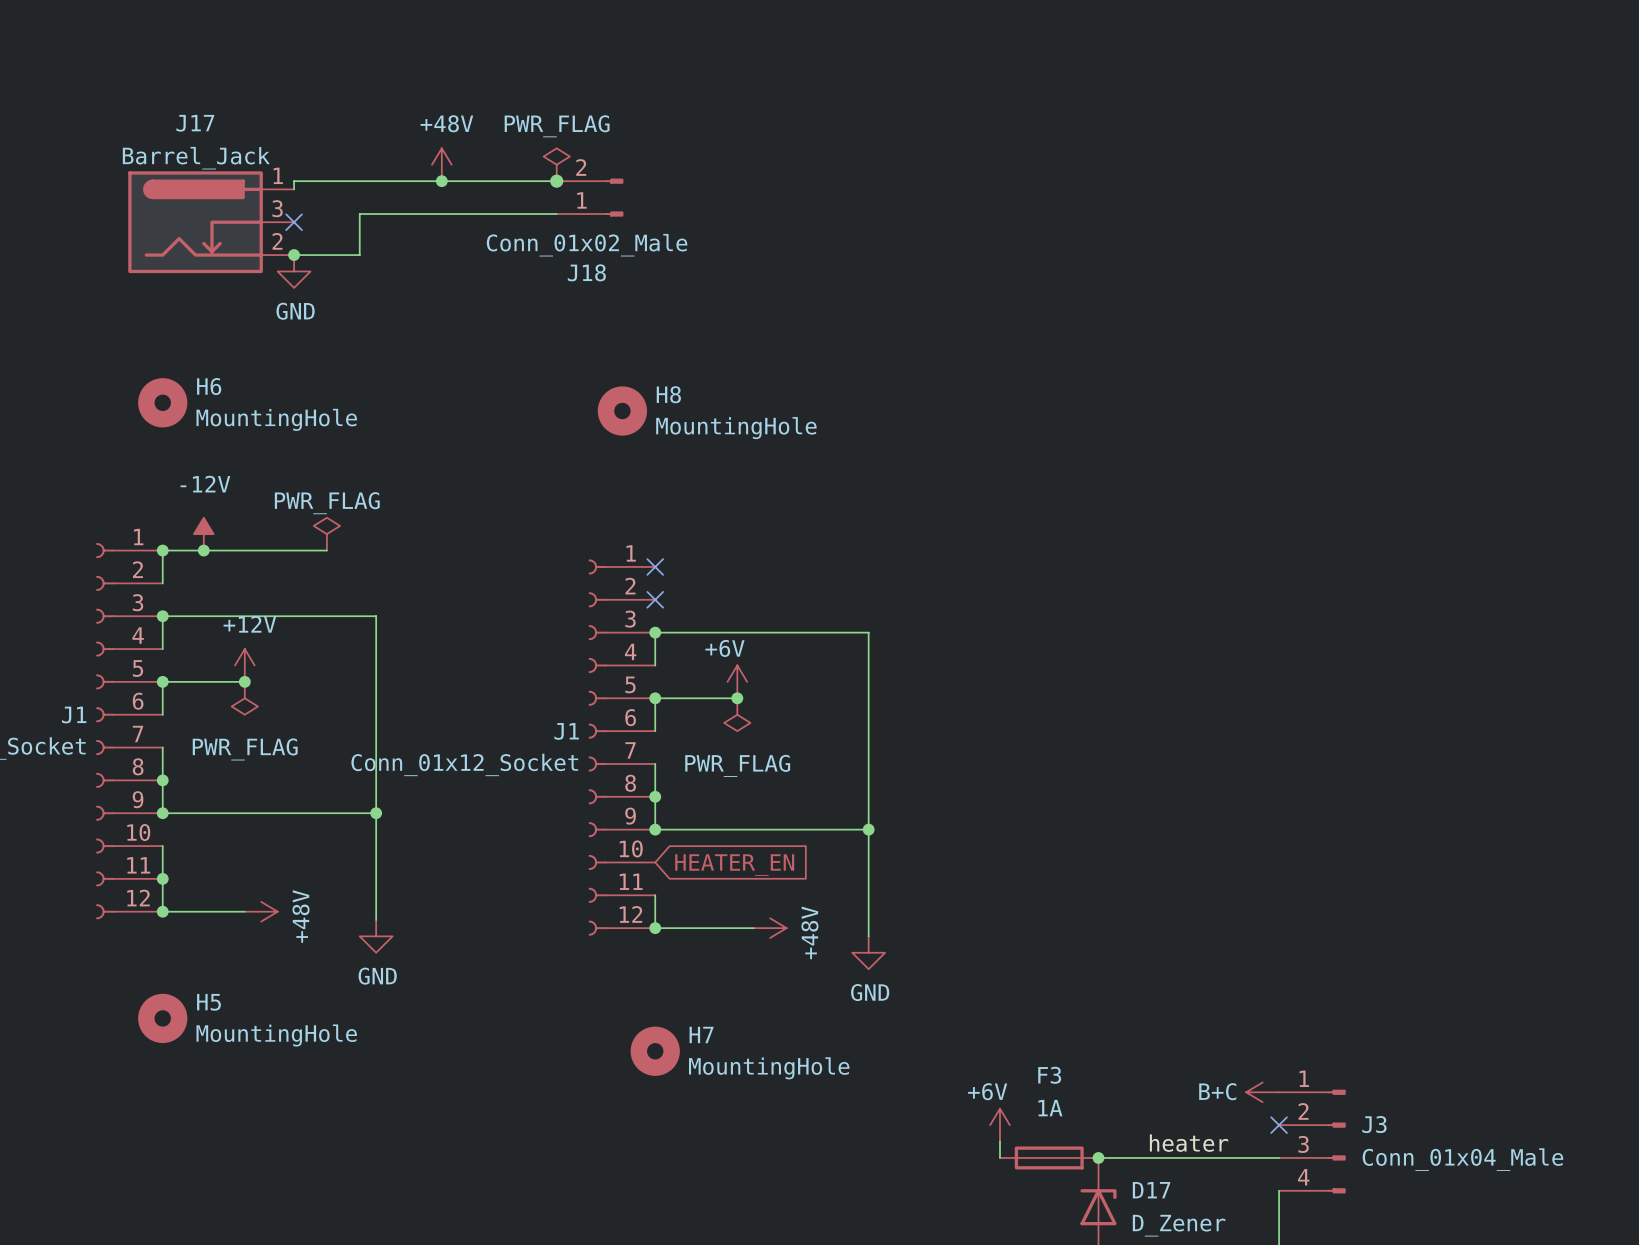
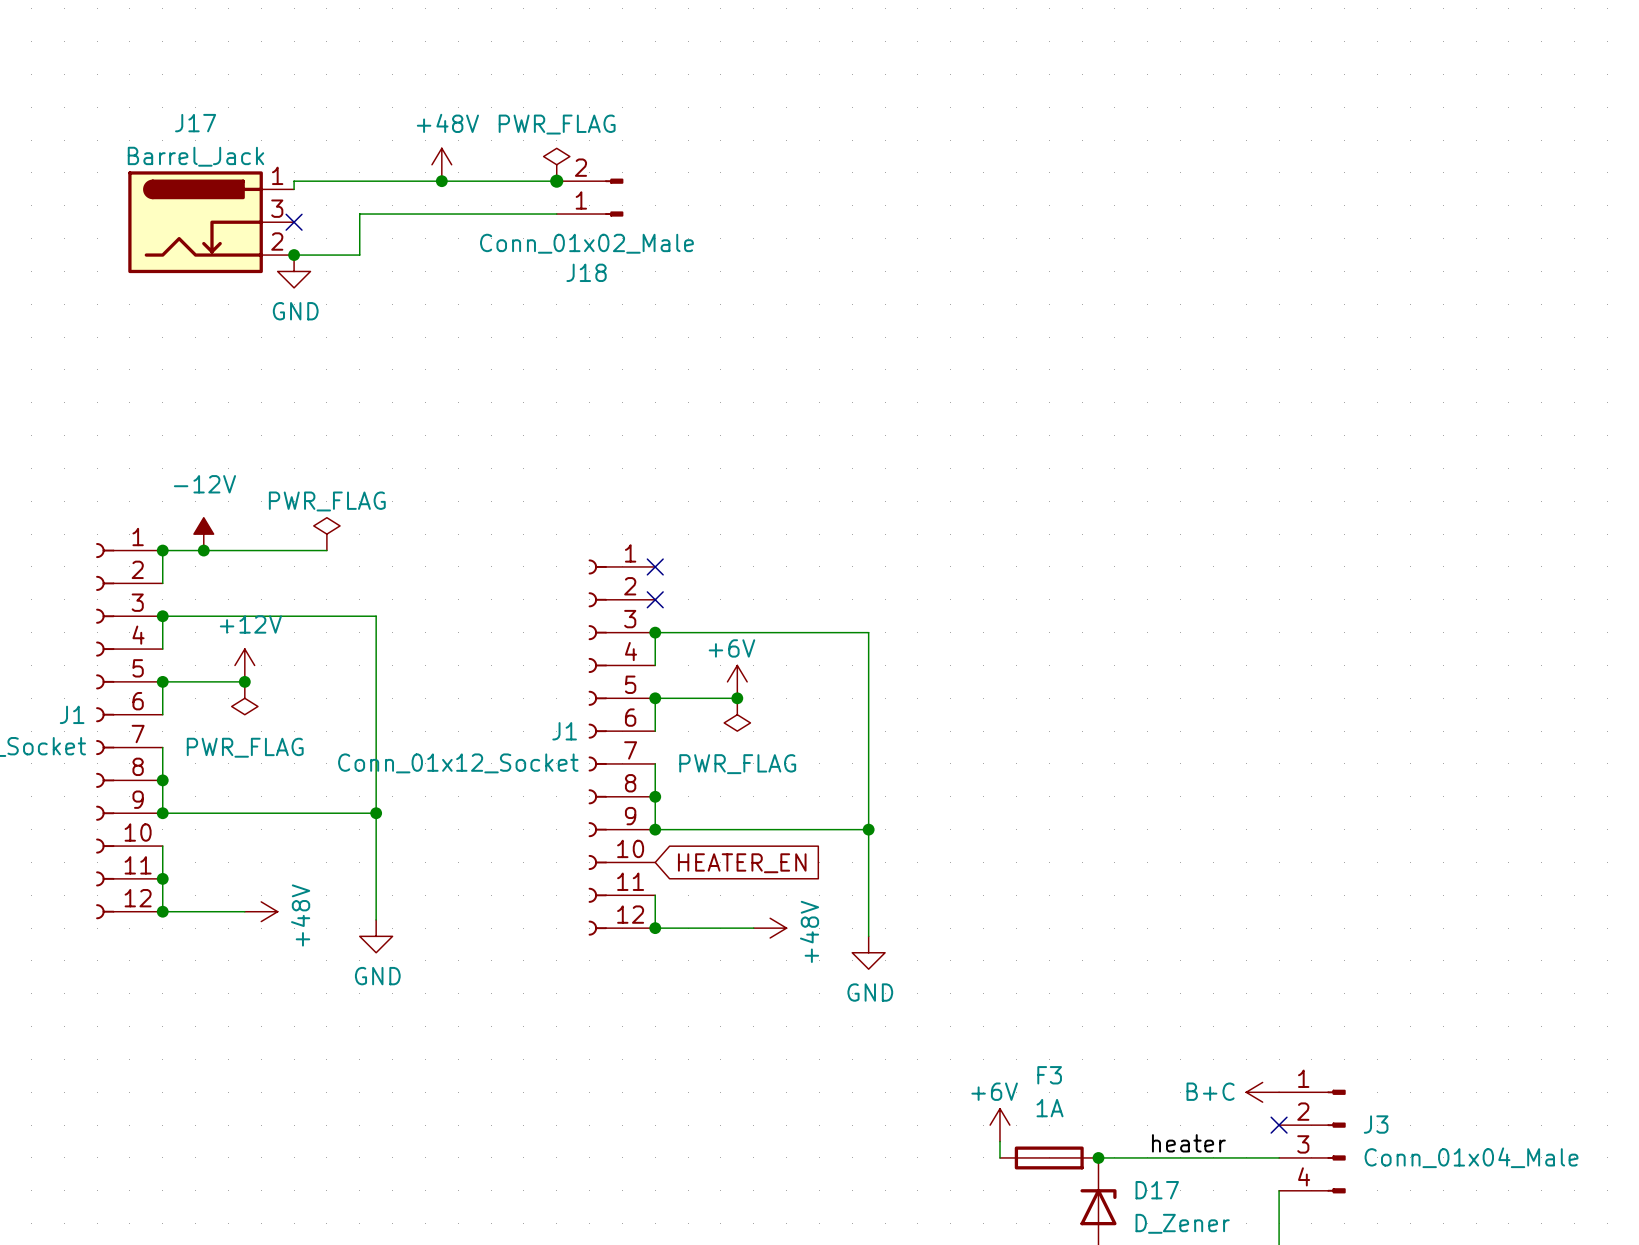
H6: MountingHole (162, 402) -> none
H8: MountingHole (622, 411) -> none
H5: MountingHole (162, 1018) -> none
H7: MountingHole (655, 1051) -> none

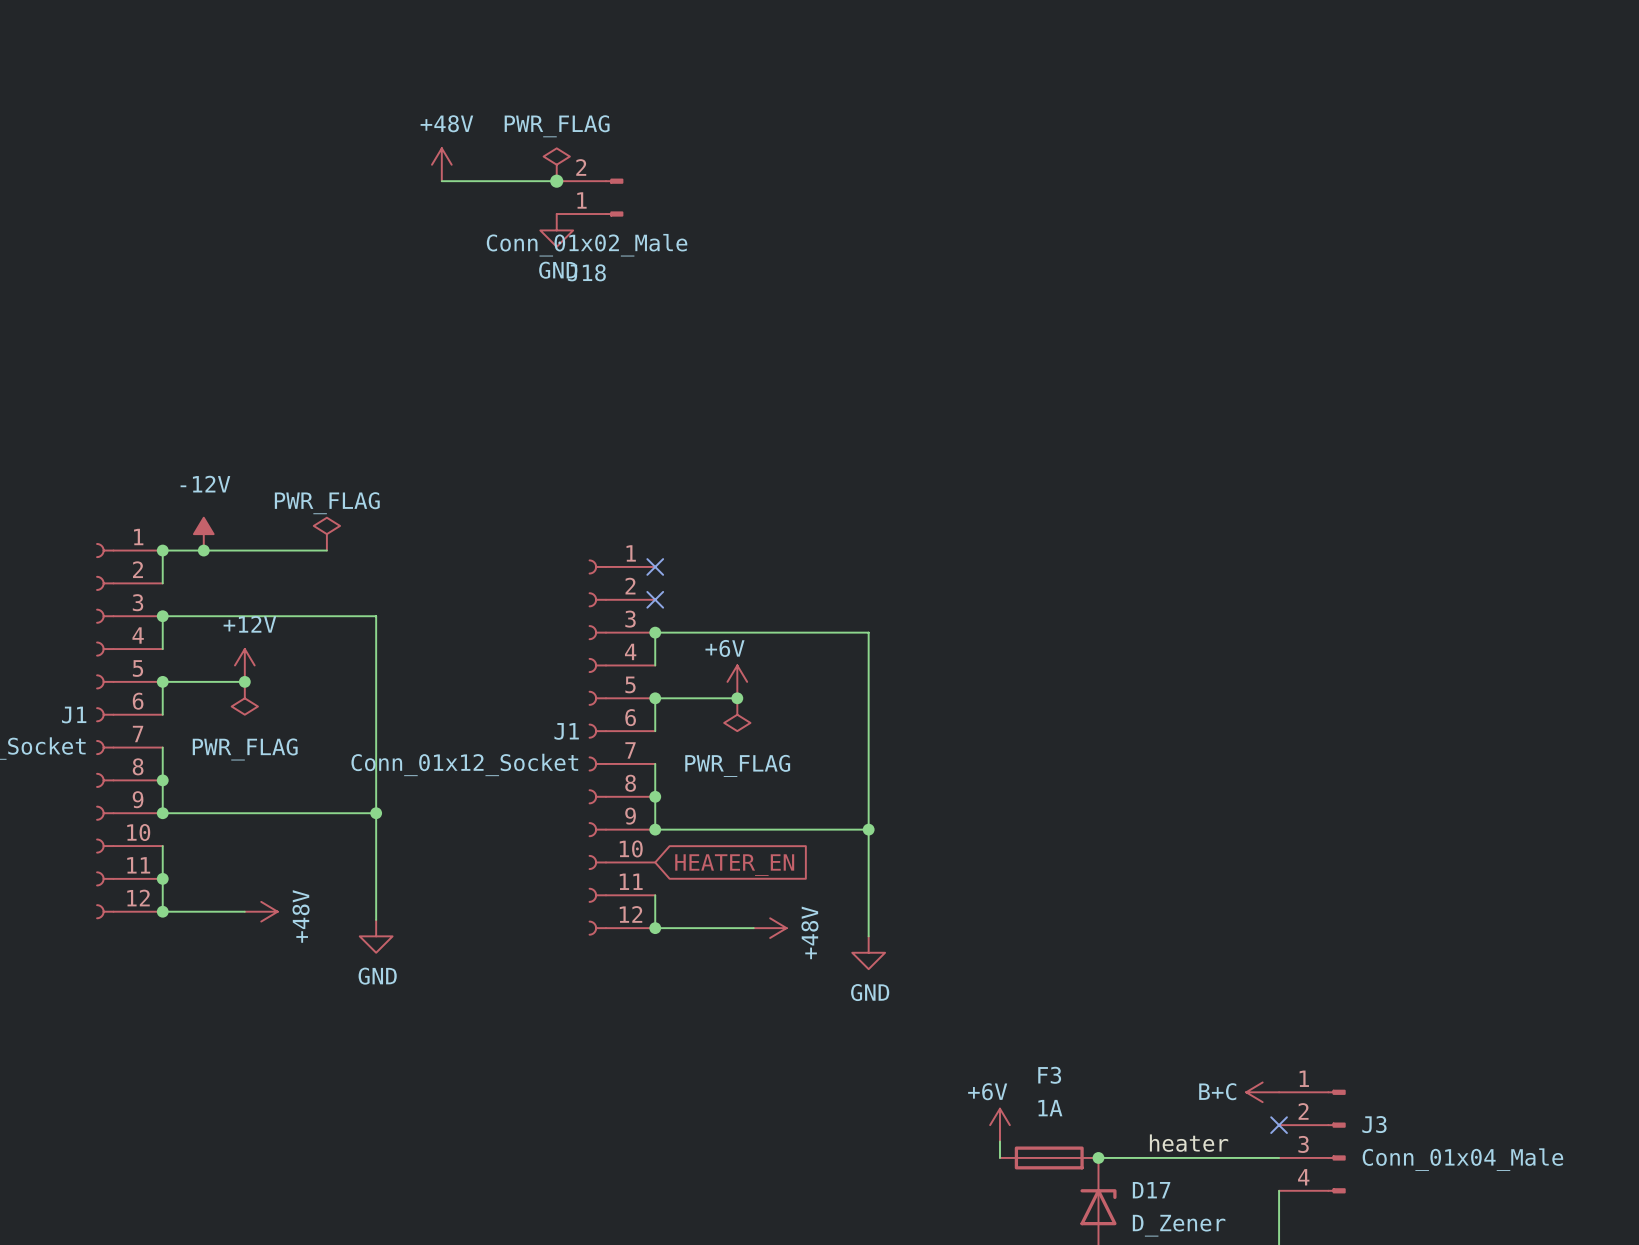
wire: (441, 181) (294, 181) (294, 189) -> none
junction: (441, 181) -> none
wire: (556, 214) (359, 214) (359, 255) (294, 255) -> none
J17: Barrel_Jack (211, 222) -> none
no-connect mark: (294, 222) -> none
junction: (294, 255) -> none
power symbol position: GND (294, 271) -> GND (556, 230)

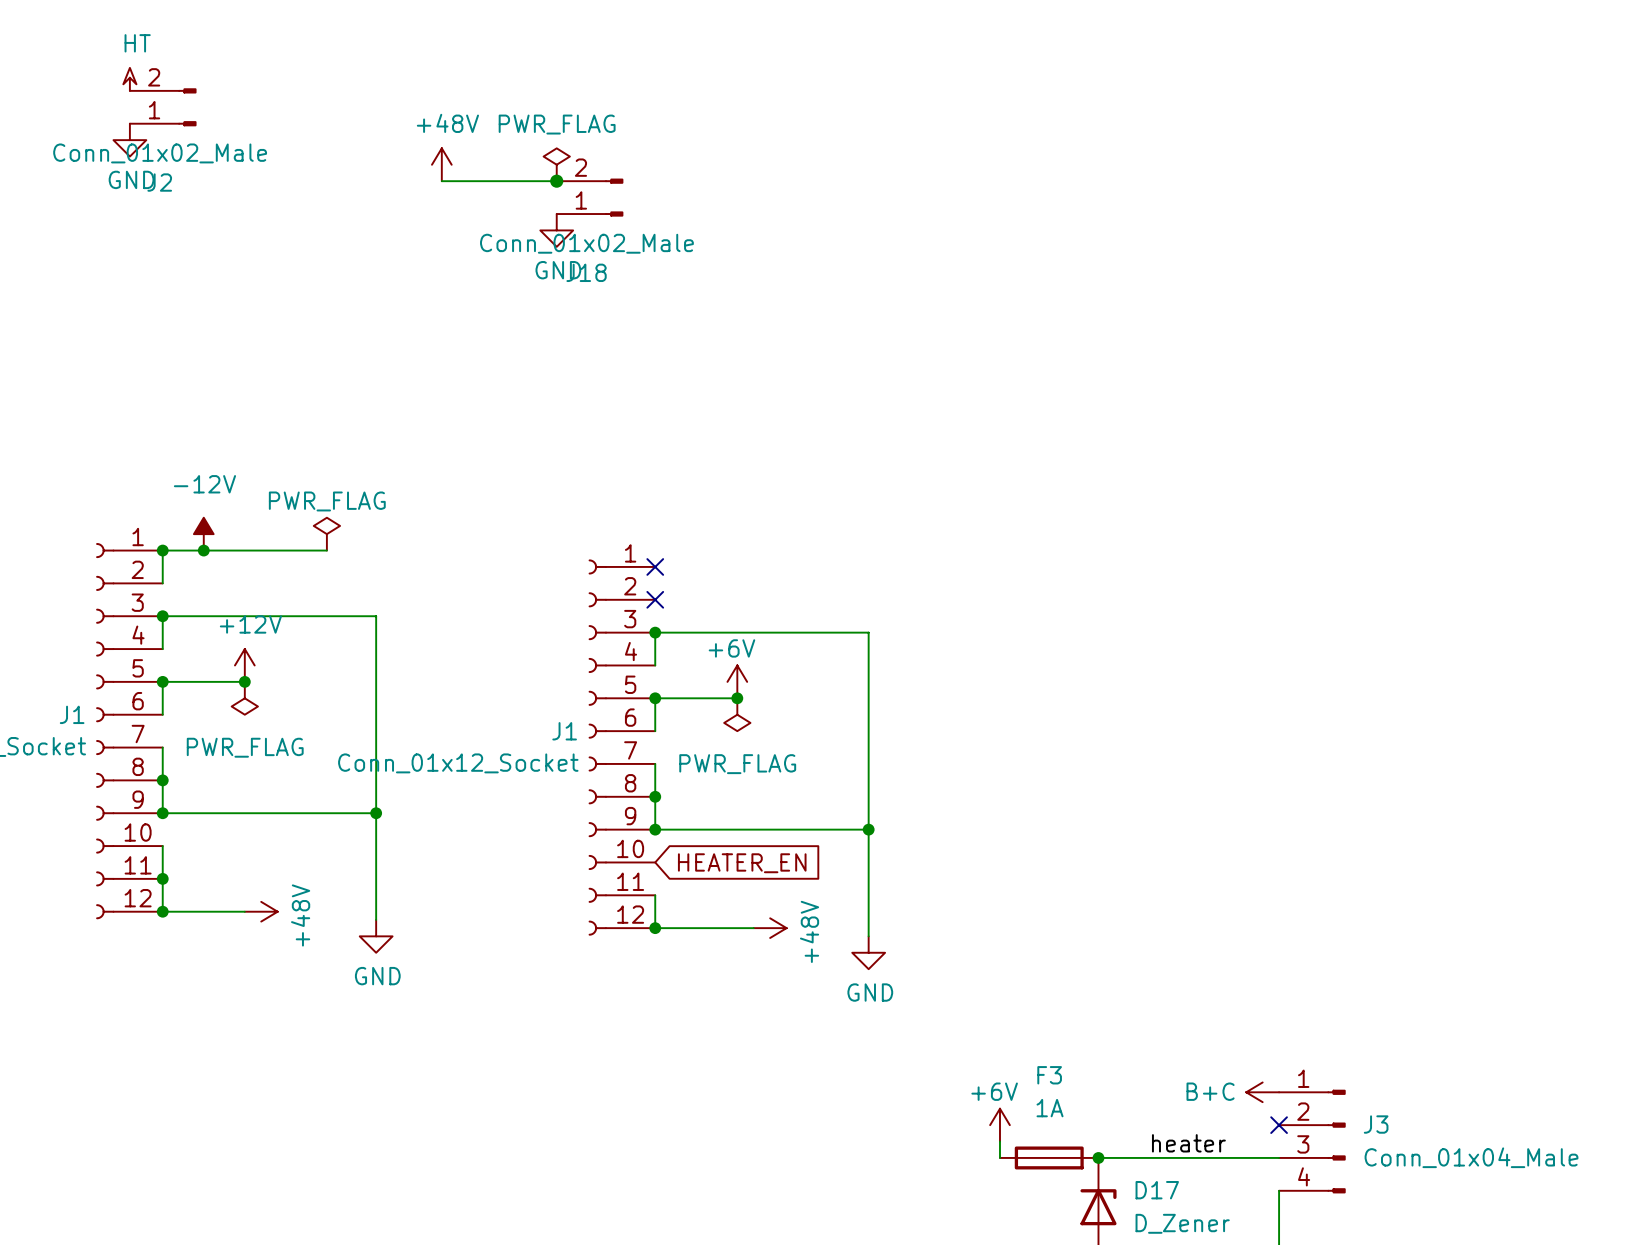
power symbol: none -> HT (129, 79)
J2: none -> Conn_01x02_Male (163, 107)
power symbol: none -> GND (129, 140)

